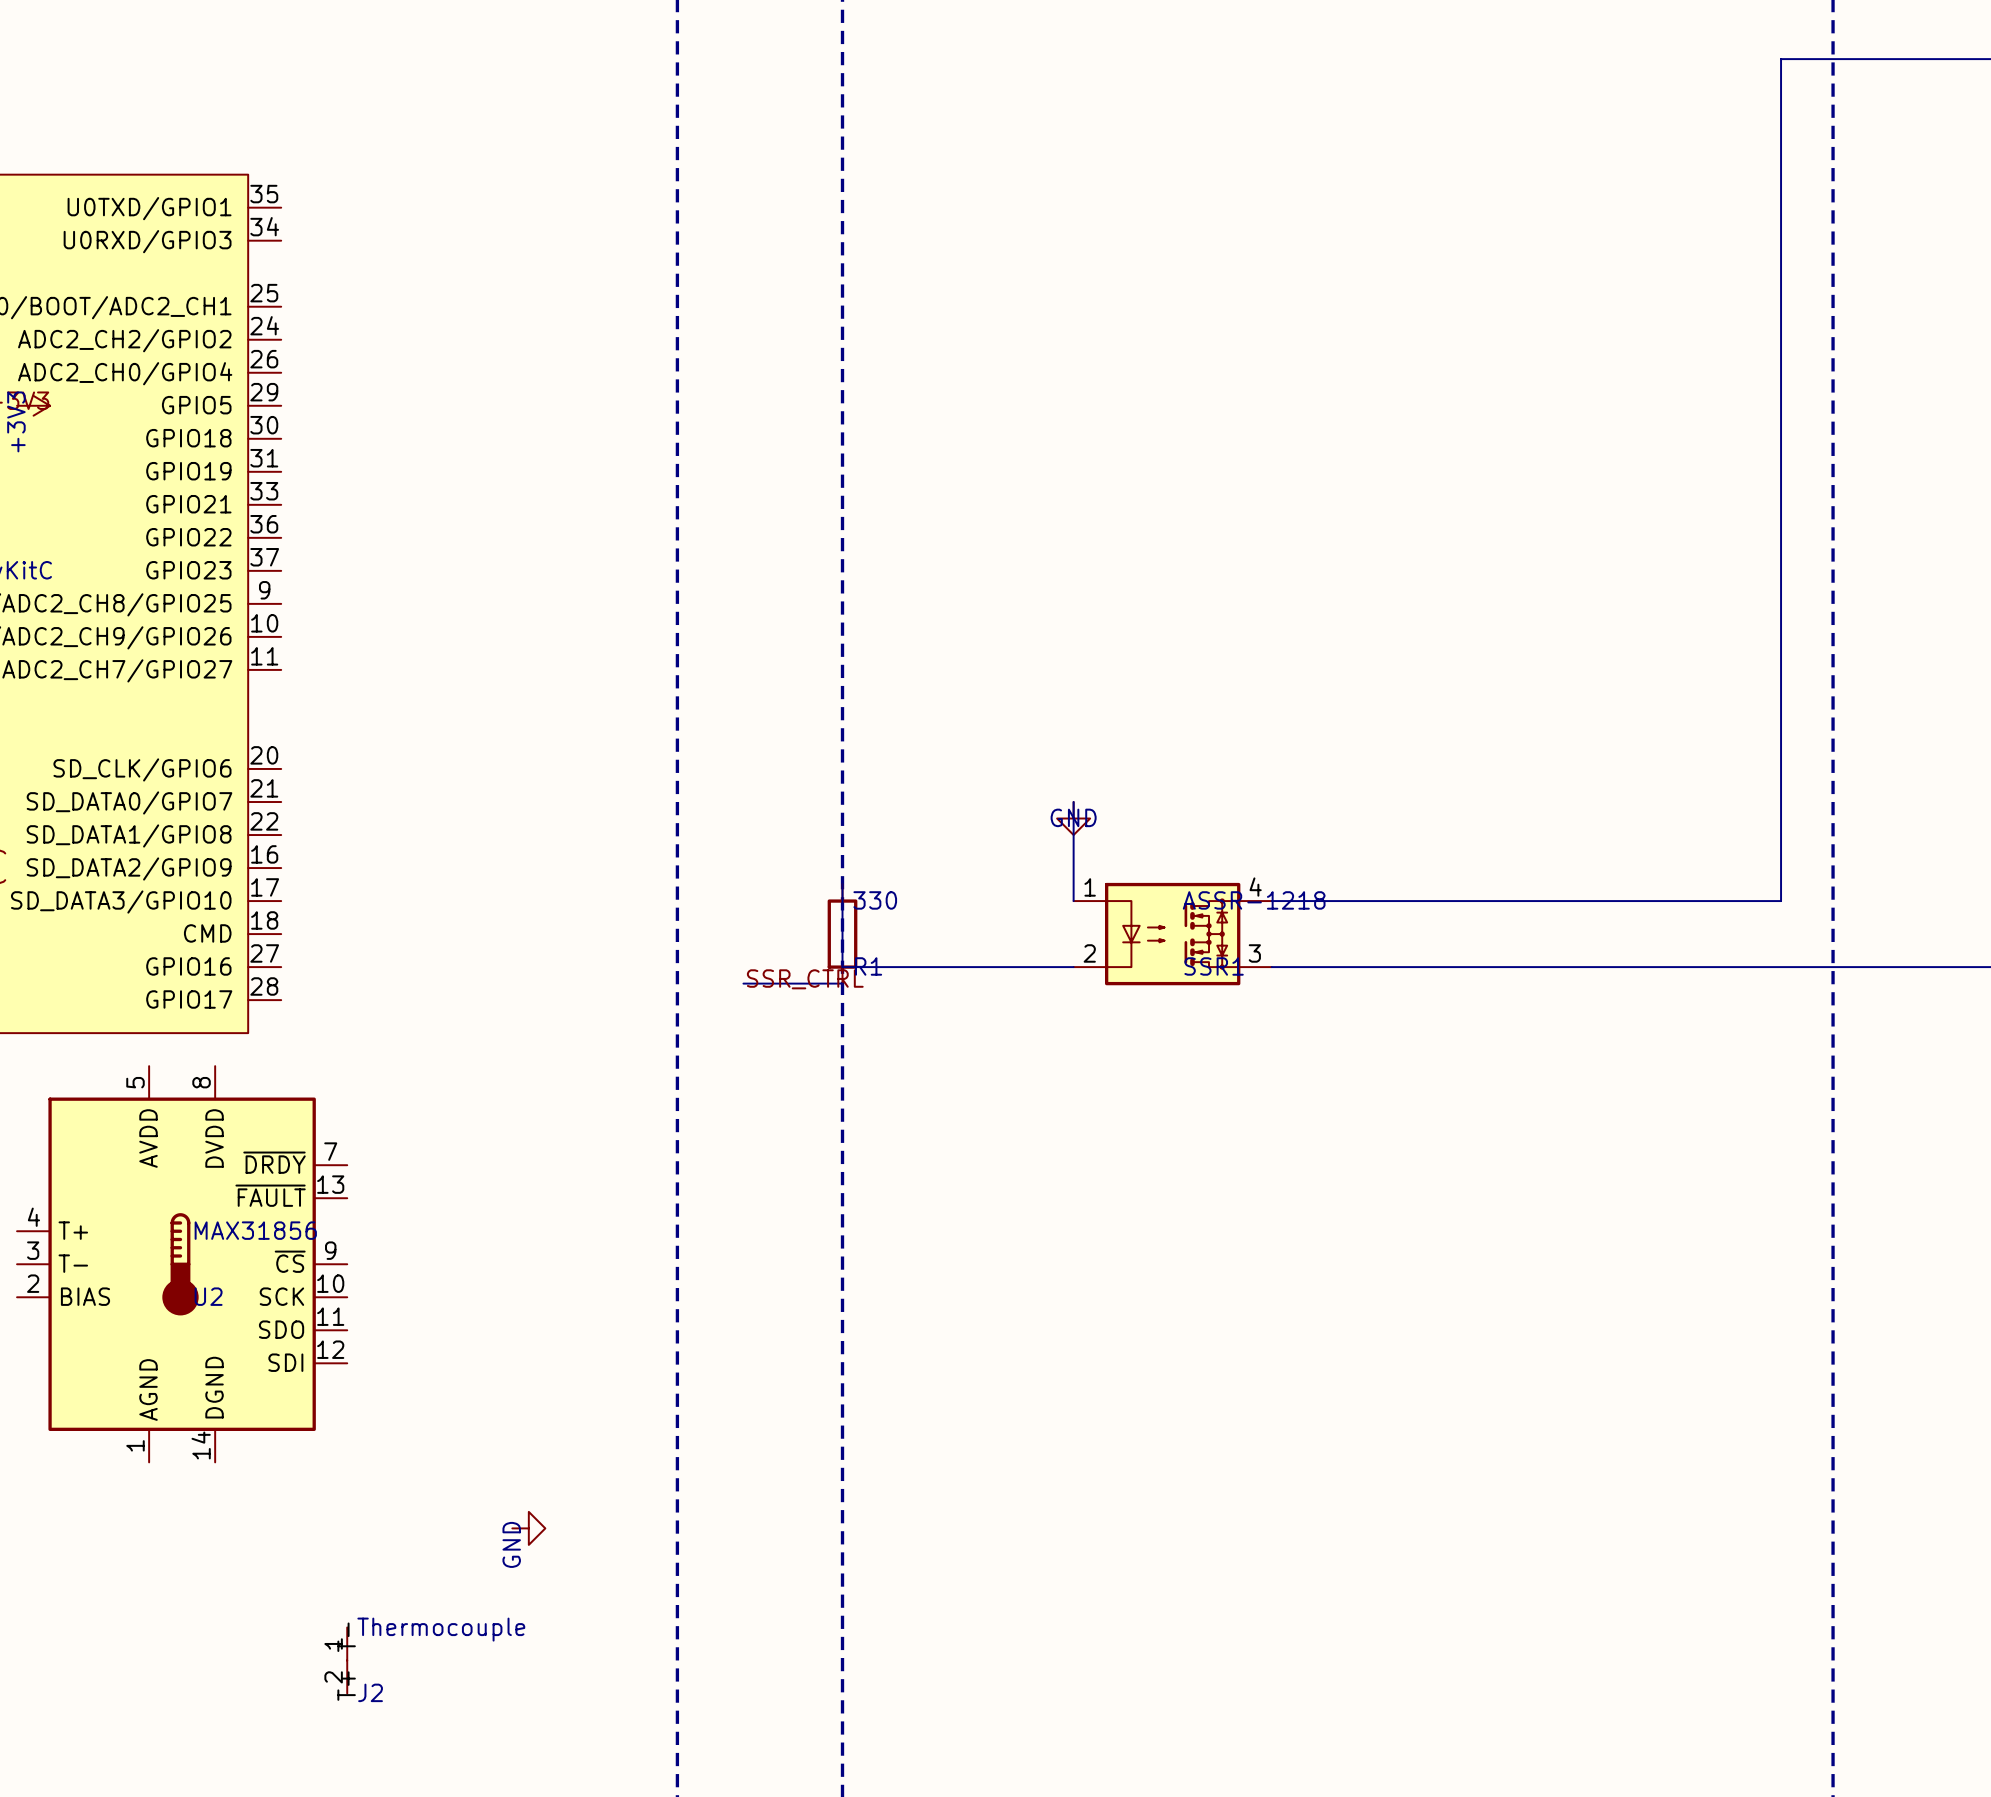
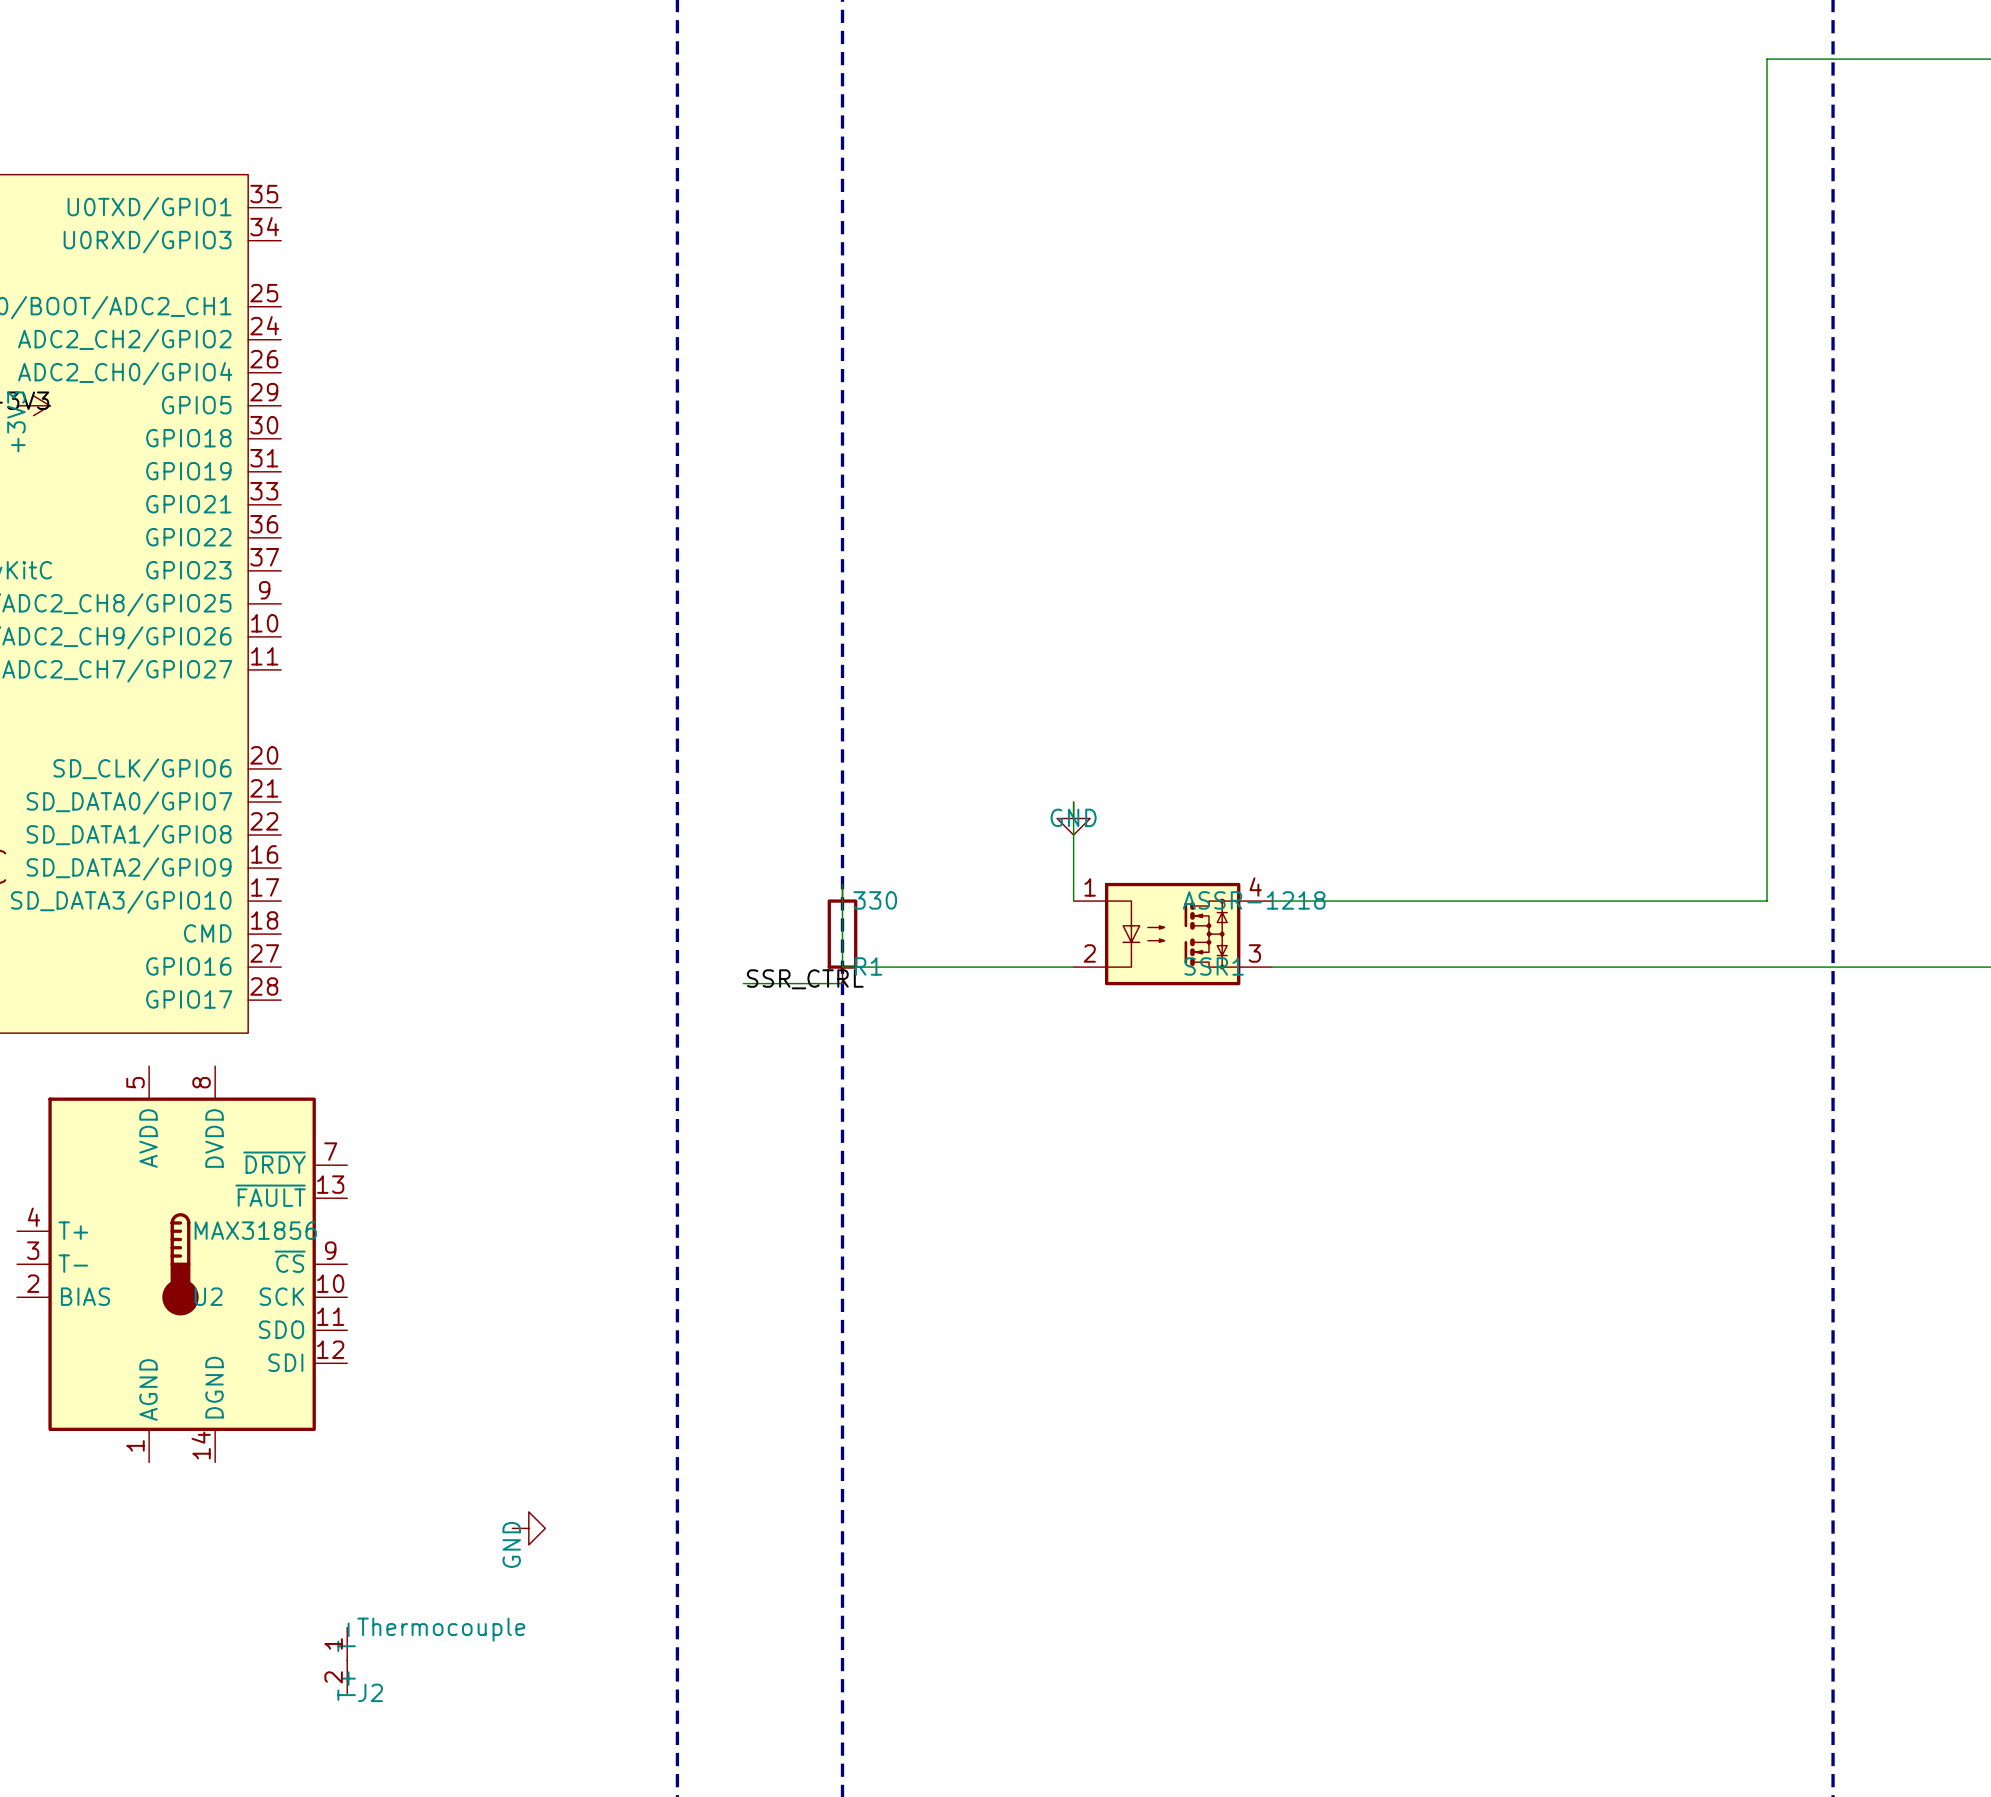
wire: (1781, 59) (1781, 901) (1767, 901) -> (1781, 59) (1767, 59) (1767, 901)

